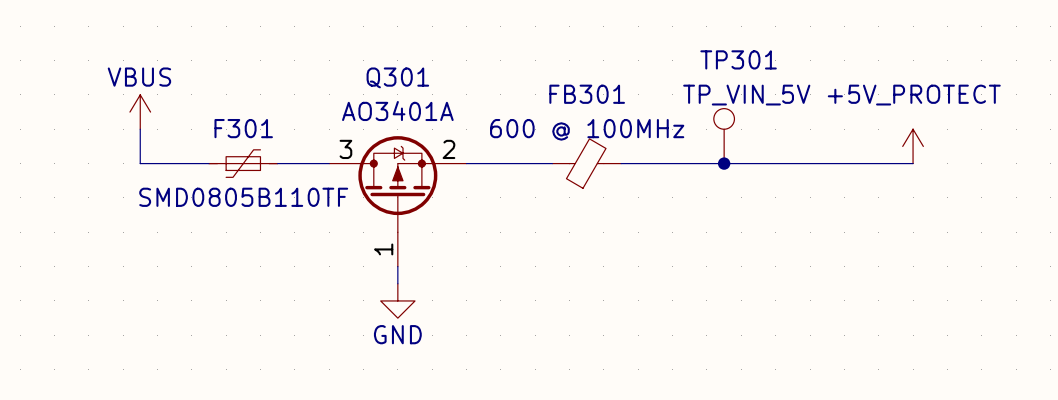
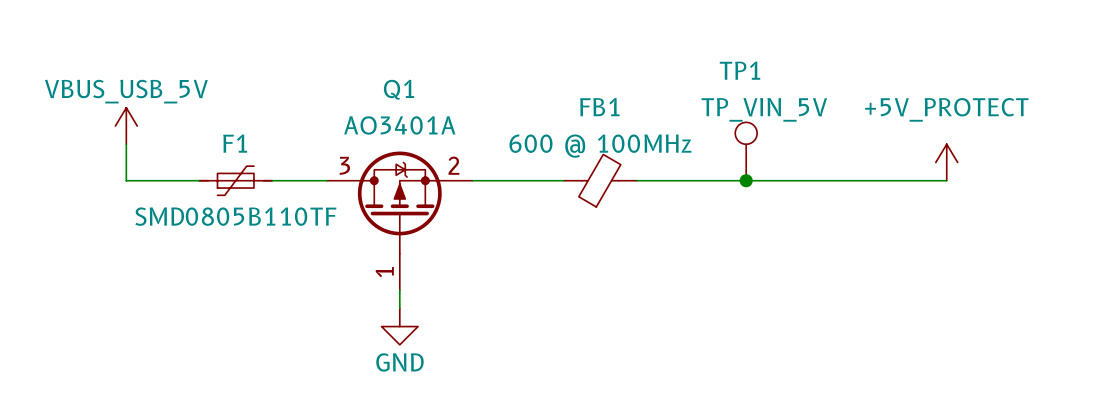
TP301 name: TP301 (738, 59) -> TP1 (740, 70)
Q301 name: Q301 (397, 77) -> Q1 (399, 89)
FB301 name: FB301 (587, 94) -> FB1 (599, 107)
power symbol: VBUS (140, 112) -> VBUS_USB_5V (126, 126)
F301 name: F301 (243, 128) -> F1 (235, 143)

